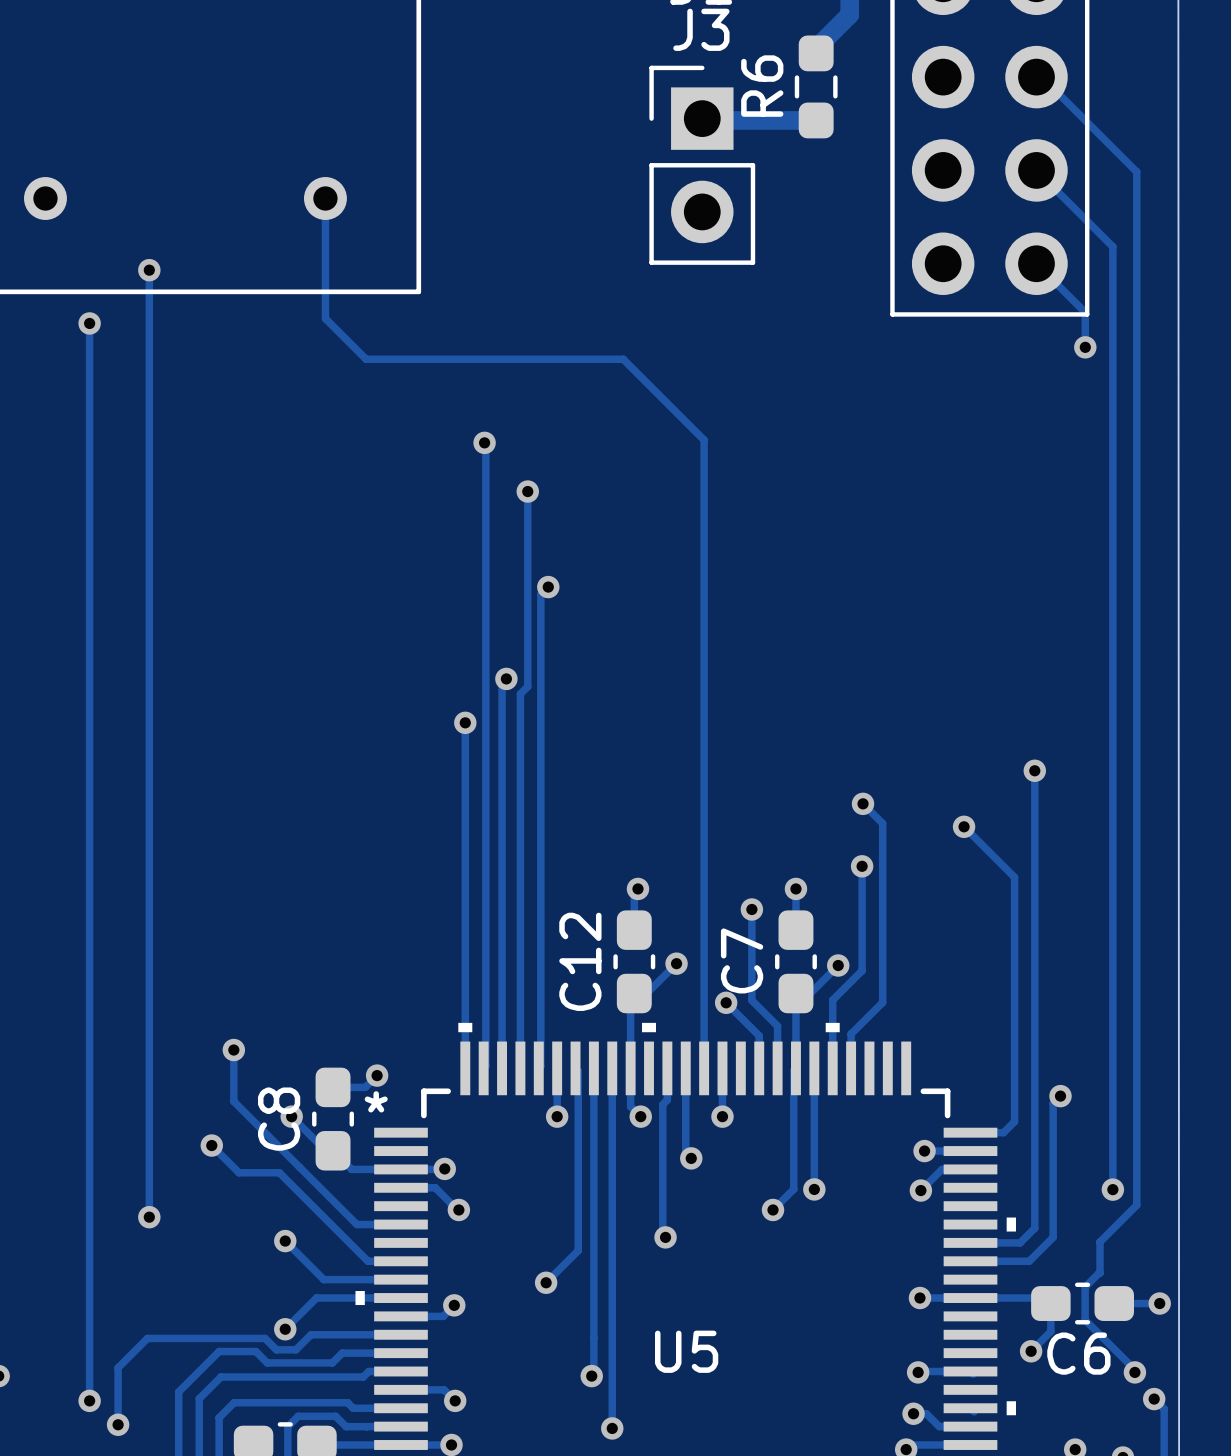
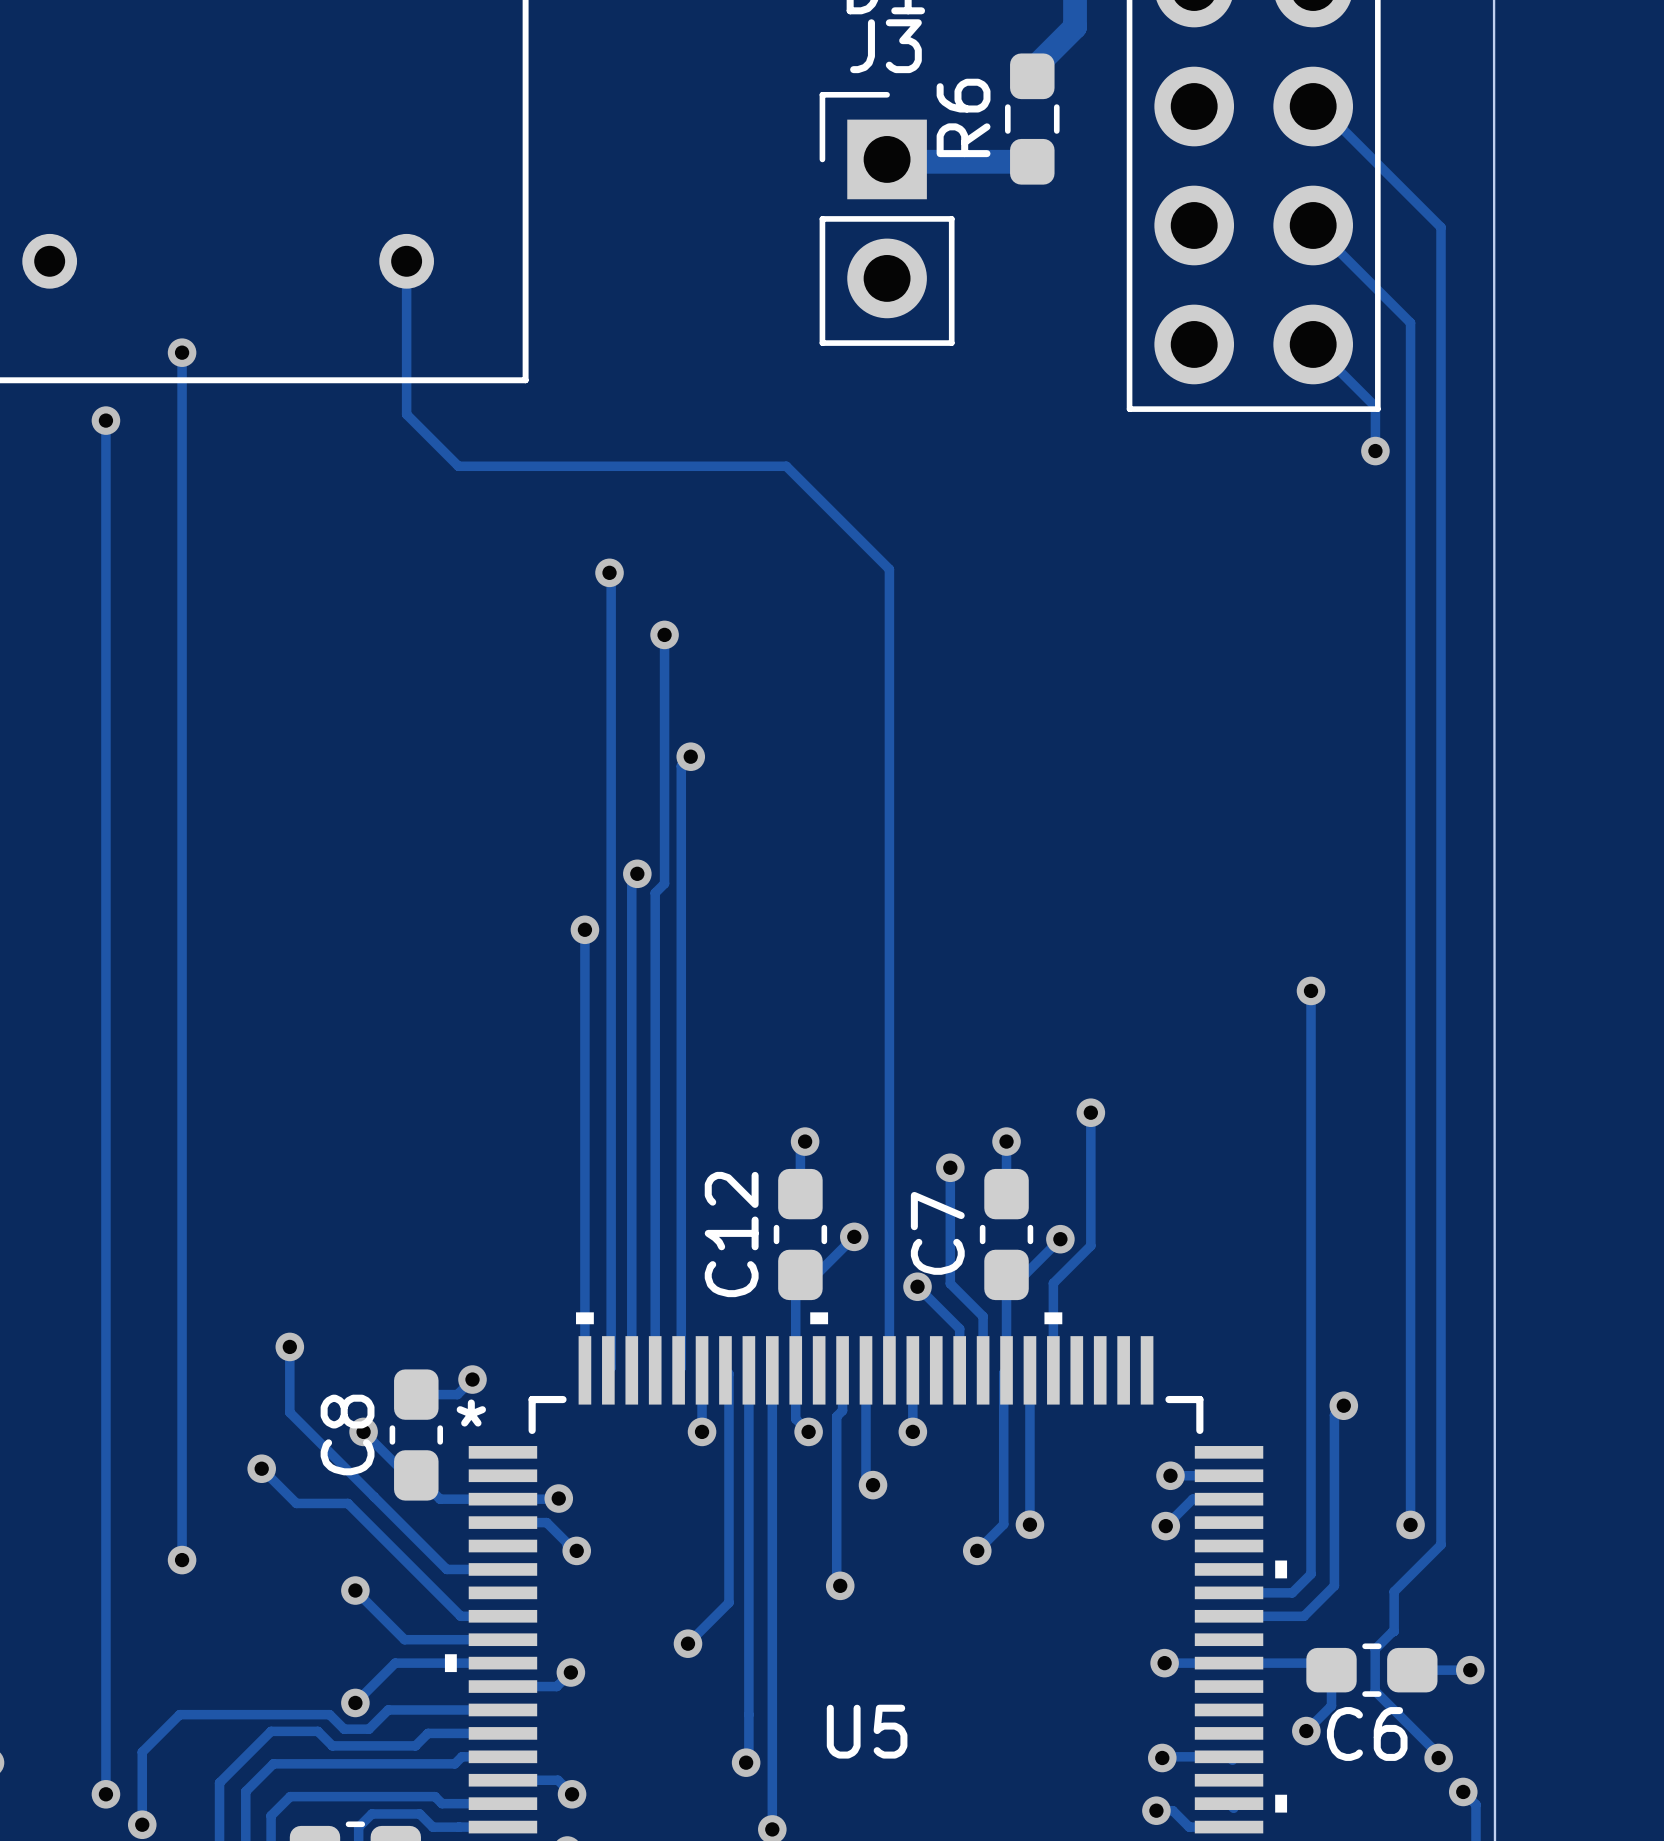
track: (863, 803) (882, 823) (882, 1002) (851, 1034) (851, 1068) -> none
via: (863, 803) -> none
track: (964, 826) (1014, 877) (1014, 1121) (1003, 1132) (970, 1132) -> none
via: (964, 826) -> none

